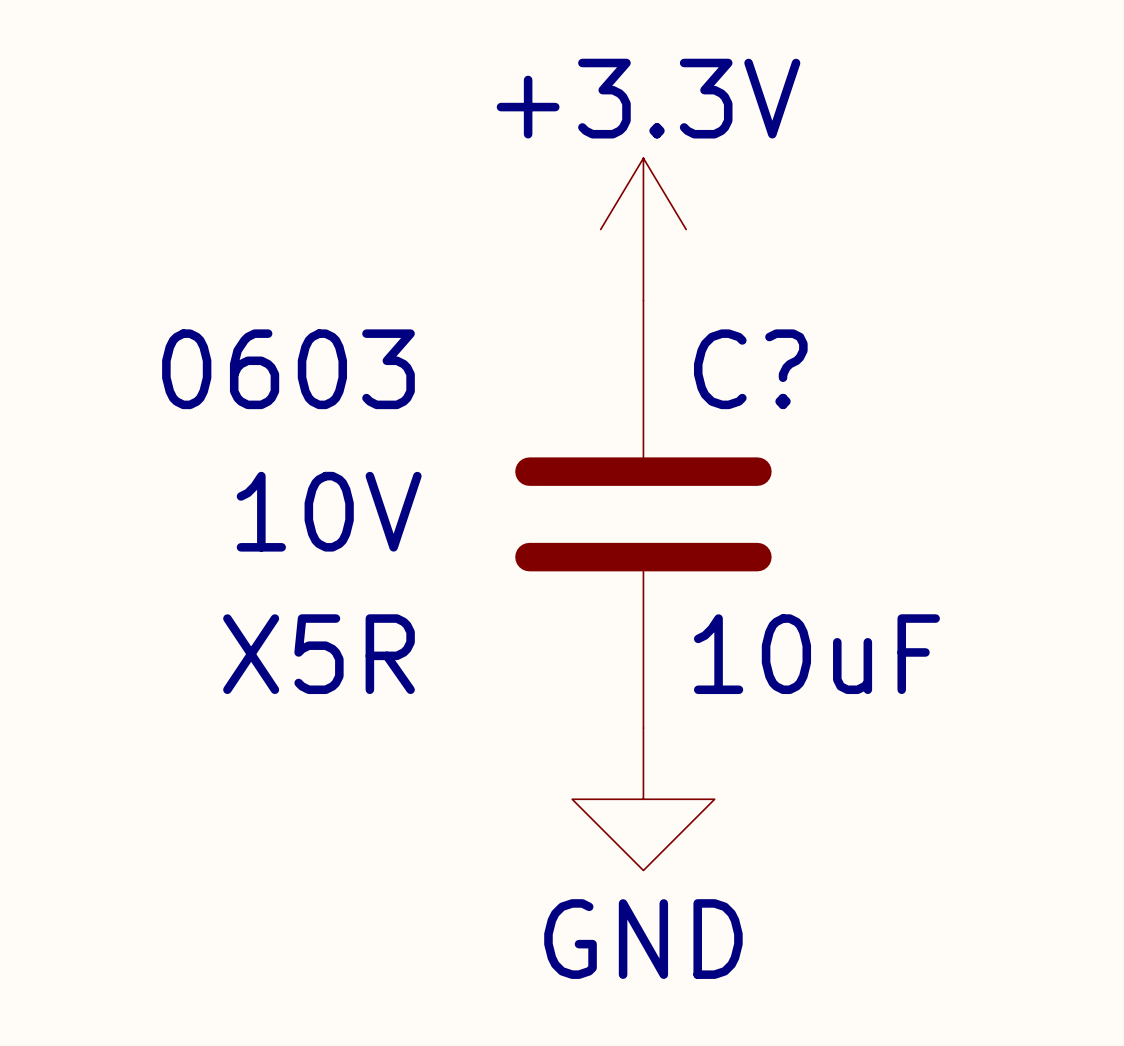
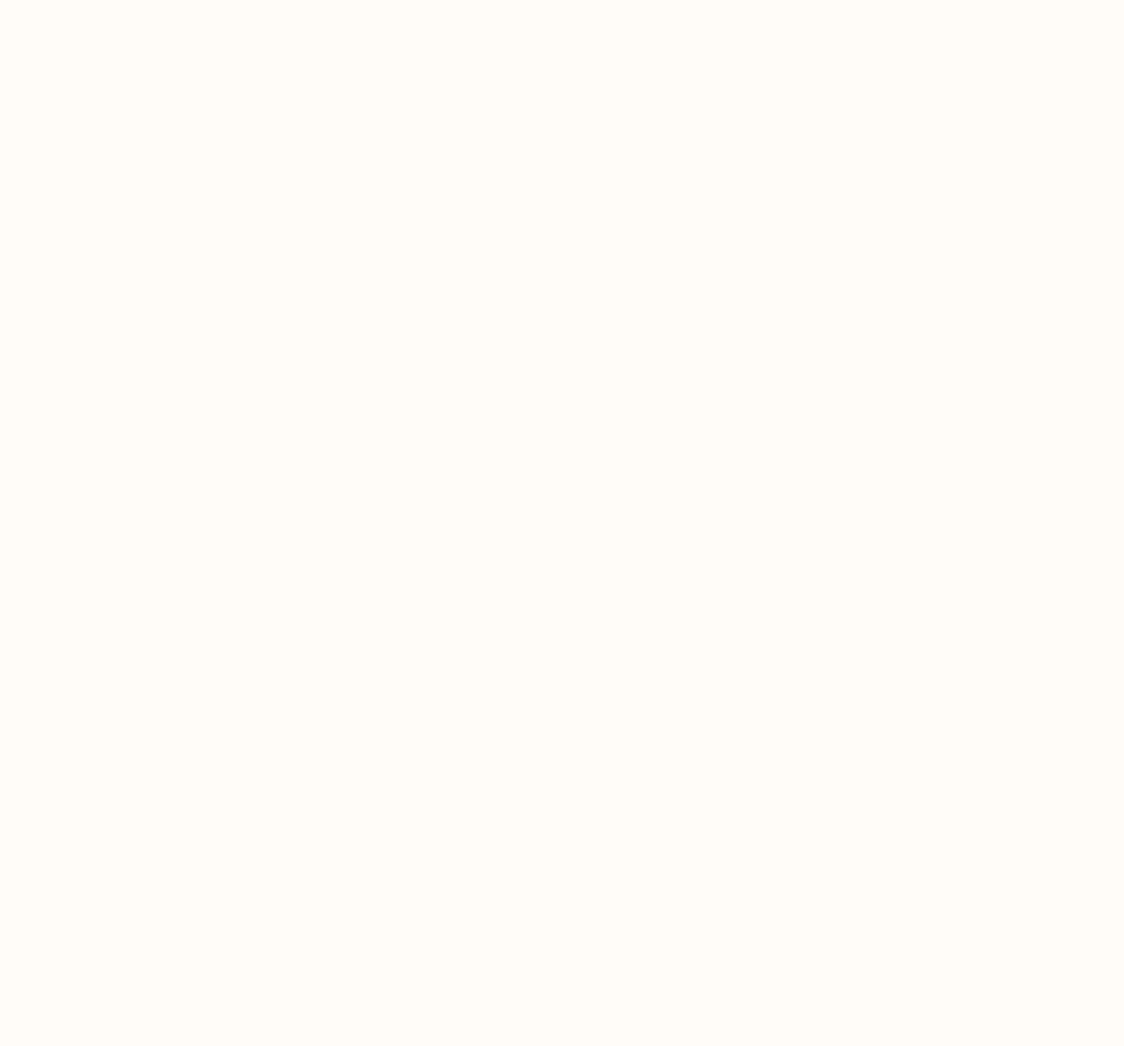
power symbol: +3.3V (643, 229) -> none
C?: 10uF (643, 514) -> none
power symbol: GND (643, 799) -> none

